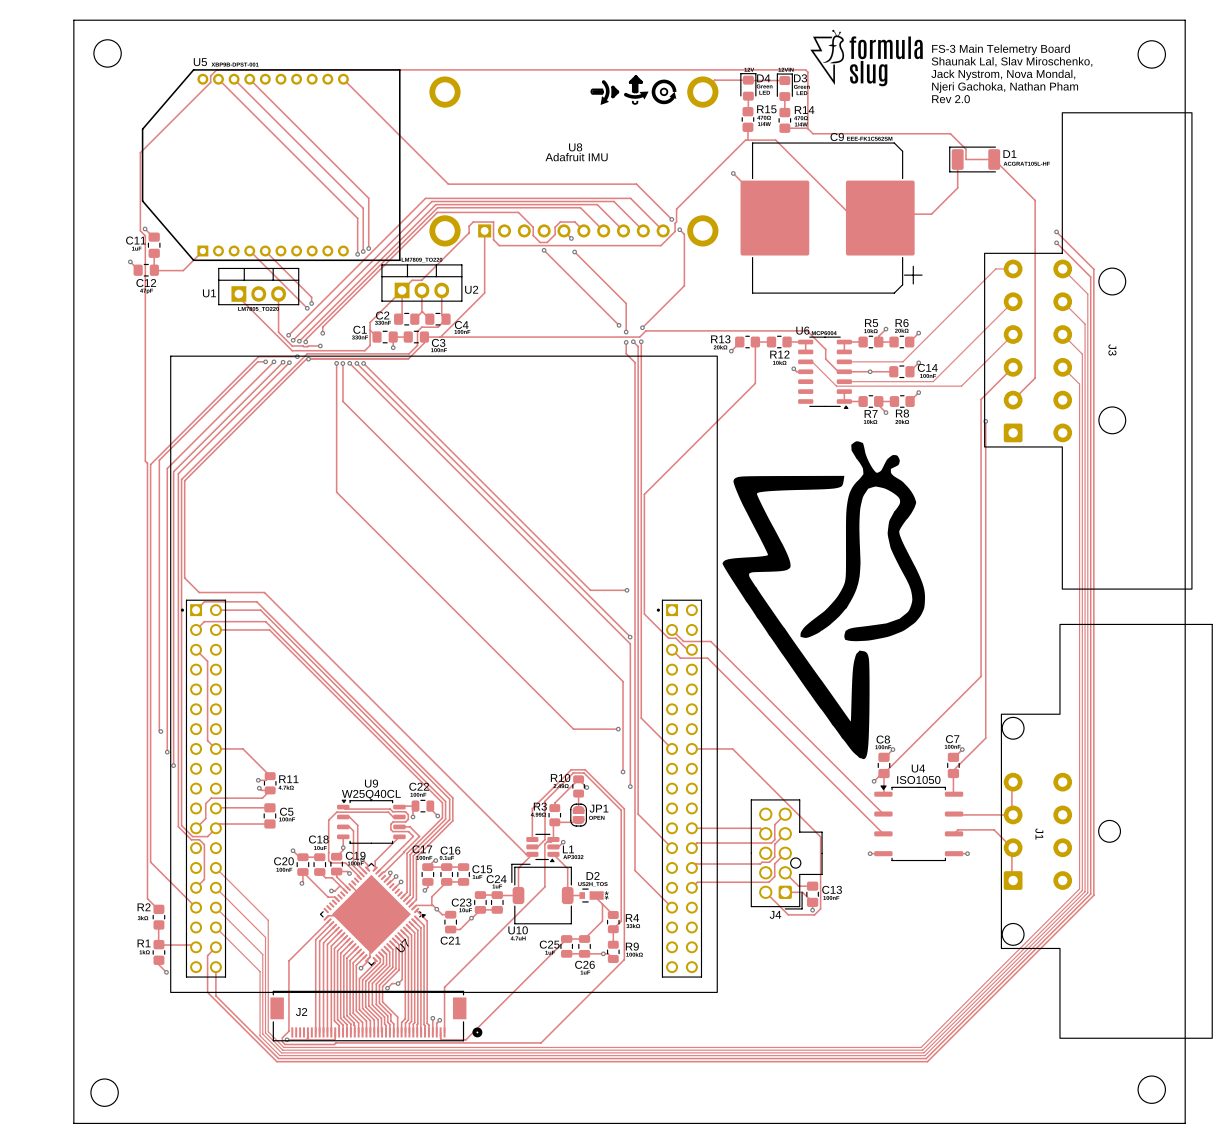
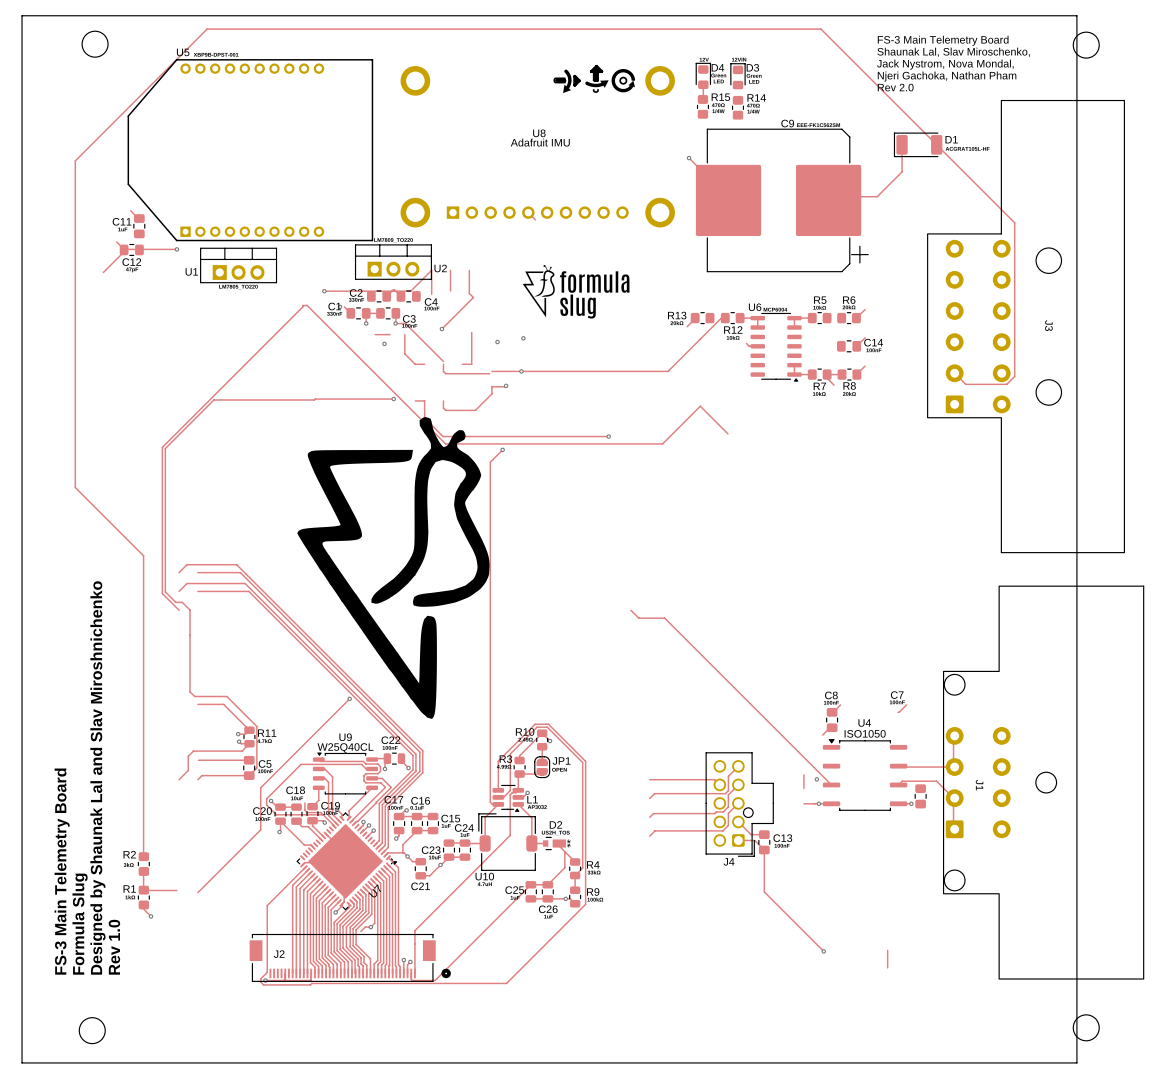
board edge: (73, 20) (1185, 20) (1185, 1123) (73, 1123) (73, 20) -> (22, 15) (1076, 15) (1076, 1062) (22, 1062) (22, 15)
drawing: [810, 29, 923, 87] -> none
track: (218, 79) (357, 218) (357, 254) -> none
track: (234, 79) (363, 208) (363, 251) -> none
track: (249, 79) (368, 198) (368, 248) -> none
track: (343, 79) (448, 184) (636, 184) (671, 219) -> none
track: (784, 80) (714, 80) (702, 92) -> none
track: (784, 96) (784, 112) -> none
track: (747, 127) (747, 140) -> none
track: (784, 128) (807, 128) (813, 133) (950, 133) (965, 149) (965, 159) (994, 159) -> none
track: (807, 128) (807, 72) (805, 69) (216, 69) (210, 75) (210, 82) (140, 152) (140, 230) (145, 235) (147, 898) (158, 909) -> (936, 144) (820, 29) (207, 29) (75, 160) (75, 487) (143, 555) (143, 857)
track: (1035, 200) (1035, 378) (1013, 400) -> (975, 183) (1014, 222) (1014, 376) (1006, 384) (965, 384) (954, 373)
track: (880, 218) (853, 218) (775, 140) (745, 140) (676, 209) (675, 231) (661, 245) (499, 245) (493, 239) (493, 222) (473, 222) (469, 226) (469, 232) (421, 280) (412, 280) (370, 322) (370, 345) (364, 350) (292, 350) (238, 297) (238, 293) -> none
via: (671, 219) -> none
via: (145, 228) -> none
track: (679, 229) (684, 234) (684, 285) (642, 327) -> none
via: (679, 229) -> none
track: (484, 230) (484, 293) (440, 337) -> none
track: (583, 230) (574, 222) (560, 222) (555, 227) (555, 234) (547, 242) (540, 242) (533, 235) (533, 227) (518, 212) (437, 212) (322, 327) (322, 333) -> none
track: (603, 230) (580, 207) (437, 207) (305, 339) (305, 342) -> none
track: (623, 230) (597, 204) (435, 204) (299, 341) -> none
track: (643, 230) (613, 201) (431, 201) (293, 340) -> none
track: (663, 230) (630, 198) (425, 198) (288, 335) -> none
track: (1056, 231) (1093, 269) (1093, 895) (927, 1061) (276, 1061) (207, 992) (207, 955) (215, 947) -> (349, 698) (260, 787) (260, 829) (197, 892)
via: (1056, 231) -> none
via: (571, 238) -> none
track: (1056, 242) (1090, 277) (1090, 894) (926, 1058) (278, 1058) (215, 995) (215, 967) -> none
via: (1056, 242) -> none
via: (368, 248) -> none
track: (202, 250) (183, 270) (154, 270) (154, 253) -> none
track: (249, 250) (307, 308) -> none
track: (265, 250) (311, 297) (311, 303) -> none
track: (544, 250) (619, 325) -> none
via: (544, 250) -> none
via: (363, 251) -> none
track: (574, 251) (626, 303) (626, 332) -> none
via: (574, 251) -> none
via: (357, 254) -> none
via: (130, 261) -> none
track: (1013, 268) (995, 268) (902, 361) (844, 361) -> none
track: (1062, 268) (1087, 294) (1087, 892) (924, 1055) (279, 1055) (260, 1035) (260, 971) (215, 927) -> none
track: none -> (176, 249) (126, 249) (103, 272)
via: none -> (176, 249)
drawing: none -> [522, 265, 630, 319]
track: (402, 290) (402, 315) -> none
track: (421, 290) (421, 312) -> (450, 270) (450, 290)
track: (441, 290) (441, 314) (446, 319) (438, 327) (421, 327) (417, 331) (417, 345) (409, 353) (307, 353) (232, 428) -> (393, 399) (213, 399)
track: none -> (469, 270) (469, 293) (473, 297) (441, 329)
track: (278, 293) (278, 332) (292, 345) (320, 345) -> none
track: (1013, 301) (933, 381) (844, 381) -> none
track: (1062, 301) (1085, 324) (1085, 891) (923, 1052) (281, 1052) (262, 1034) (262, 954) (215, 907) -> none
via: (311, 303) -> none
via: (307, 308) -> none
track: none -> (324, 291) (410, 291) (431, 270) (431, 294)
via: none -> (324, 291)
via: (619, 325) -> none
via: (642, 327) -> none
track: (885, 329) (878, 336) (878, 342) (895, 342) -> none
via: (885, 329) -> none
via: none -> (340, 306)
via: (626, 332) -> none
via: (322, 333) -> none
via: (918, 333) -> none
track: (1013, 334) (961, 386) (836, 386) (812, 361) (805, 361) -> none
track: (1062, 334) (1082, 354) (1082, 890) (922, 1050) (282, 1050) (265, 1032) (265, 937) (215, 887) -> none
via: (288, 335) -> none
track: (424, 337) (639, 337) (645, 330) (807, 330) (825, 349) (825, 359) (838, 371) (894, 371) -> none
via: (293, 340) -> none
track: none -> (722, 317) (668, 371) (491, 371)
via: (299, 341) -> none
track: (633, 341) (638, 346) (638, 814) (672, 848) -> none
via: (633, 341) -> none
track: (641, 341) (641, 718) (672, 748) -> none
via: (641, 341) -> none
via: (305, 342) -> none
track: (424, 342) (408, 358) (306, 358) (184, 480) (184, 577) (199, 592) (264, 592) (523, 852) -> (502, 449) (490, 462) (490, 802)
track: none -> (395, 318) (395, 323) (405, 323) (443, 361)
track: (626, 342) (626, 353) (635, 362) (635, 870) (672, 907) -> none
via: (626, 342) -> none
track: (771, 342) (755, 342) (755, 383) (644, 494) (644, 614) (668, 638) (675, 638) (687, 649) (691, 649) -> none
via: (320, 345) -> none
via: none -> (395, 323)
via: (731, 351) -> none
via: none -> (441, 329)
track: (297, 356) (258, 356) (150, 464) (150, 862) (196, 907) -> none
via: (297, 356) -> none
track: none -> (471, 332) (471, 364) (462, 364)
via: (308, 359) -> none
track: none -> (375, 334) (390, 334)
track: none -> (404, 334) (404, 353) (415, 364) (424, 364)
track: (265, 361) (257, 361) (159, 460) (159, 730) (160, 731) -> none
via: (265, 361) -> none
track: (273, 361) (167, 468) (167, 752) -> none
via: (273, 361) -> none
track: (283, 362) (173, 471) (173, 765) -> none
via: (283, 362) -> none
track: (289, 362) (178, 473) (178, 826) (191, 839) (199, 839) (204, 844) (204, 879) (196, 887) -> none
via: (289, 362) -> none
via: (918, 362) -> none
track: (336, 363) (336, 492) (573, 729) (618, 729) -> none
via: (336, 363) -> none
track: (342, 363) (342, 401) (623, 681) (623, 771) -> none
via: (342, 363) -> none
track: (349, 363) (630, 643) (630, 786) -> none
via: (349, 363) -> none
track: (356, 363) (630, 637) -> none
via: (356, 363) -> none
track: (363, 363) (590, 590) (626, 590) -> none
via: (363, 363) -> none
via: none -> (523, 338)
via: none -> (497, 342)
track: (1013, 367) (981, 399) (981, 676) (884, 773) (883, 794) -> none
track: (1062, 367) (1079, 384) (1079, 888) (921, 1047) (283, 1047) (268, 1031) (268, 920) (215, 867) -> none
via: (793, 368) -> none
via: none -> (384, 343)
via: (870, 371) -> none
track: none -> (443, 364) (443, 371) (445, 373) (489, 373)
via: (918, 392) -> none
via: none -> (521, 371)
via: (885, 412) -> none
track: none -> (506, 385) (491, 386) (491, 393) (475, 410) (445, 410) (443, 408) (443, 400)
via: none -> (506, 385)
track: (985, 421) (985, 738) (953, 770) (953, 793) -> none
via: (985, 421) -> none
via: none -> (393, 399)
track: none -> (415, 400) (424, 400) (424, 418) (443, 436) (608, 436)
drawing: [722, 441, 926, 760] -> none
drawing: none -> [297, 417, 490, 719]
track: none -> (727, 433) (700, 406) (662, 443) (445, 443) (307, 305) (302, 305) (162, 447) (162, 593) (179, 610)
via: none -> (608, 436)
via: none -> (502, 449)
via: (626, 590) -> none
track: (672, 629) (683, 641) (710, 641) (883, 814) -> none
track: (181, 630) (181, 825) (192, 836) (207, 836) (215, 828) -> none
via: (630, 637) -> none
track: (196, 649) (207, 661) -> (165, 591) (175, 602) (182, 602) (190, 610) (190, 621)
part: (443, 674) -> none
track: (207, 676) (207, 740) (215, 748) -> (189, 635) (189, 691) (194, 696) (226, 696) (256, 726) (256, 767) (249, 775)
via: (618, 729) -> none
via: (160, 731) -> none
via: none -> (349, 698)
track: (691, 748) (732, 748) (820, 836) (820, 908) (814, 914) (788, 914) (765, 892) -> none
via: (892, 749) -> none
via: (962, 749) -> none
via: (167, 752) -> none
via: (173, 765) -> none
part position: (953, 765) -> (920, 796)
via: (623, 771) -> none
via: (874, 781) -> none
via: (630, 786) -> none
track: (336, 812) (328, 820) (328, 852) -> (312, 764) (301, 764) (266, 798) (266, 805) (276, 814) (323, 814)
track: none -> (803, 774) (803, 788)
text: none -> Designed by Shaunak Lal and Slav Miroshnichenko (97, 777)
via: none -> (816, 779)
via: (343, 847) -> none
track: none -> (803, 803) (818, 803)
track: (340, 885) (335, 890) (331, 890) -> none
via: (331, 890) -> none
track: none -> (764, 857) (764, 891) (823, 951)
via: (812, 910) -> none
text: none -> FS-3 Main Telemetry Board (62, 871)
text: none -> Formula Slug (80, 924)
via: (387, 988) -> none
text: none -> Rev 1.0 (114, 947)
track: none -> (887, 950) (887, 967)
via: none -> (823, 951)

